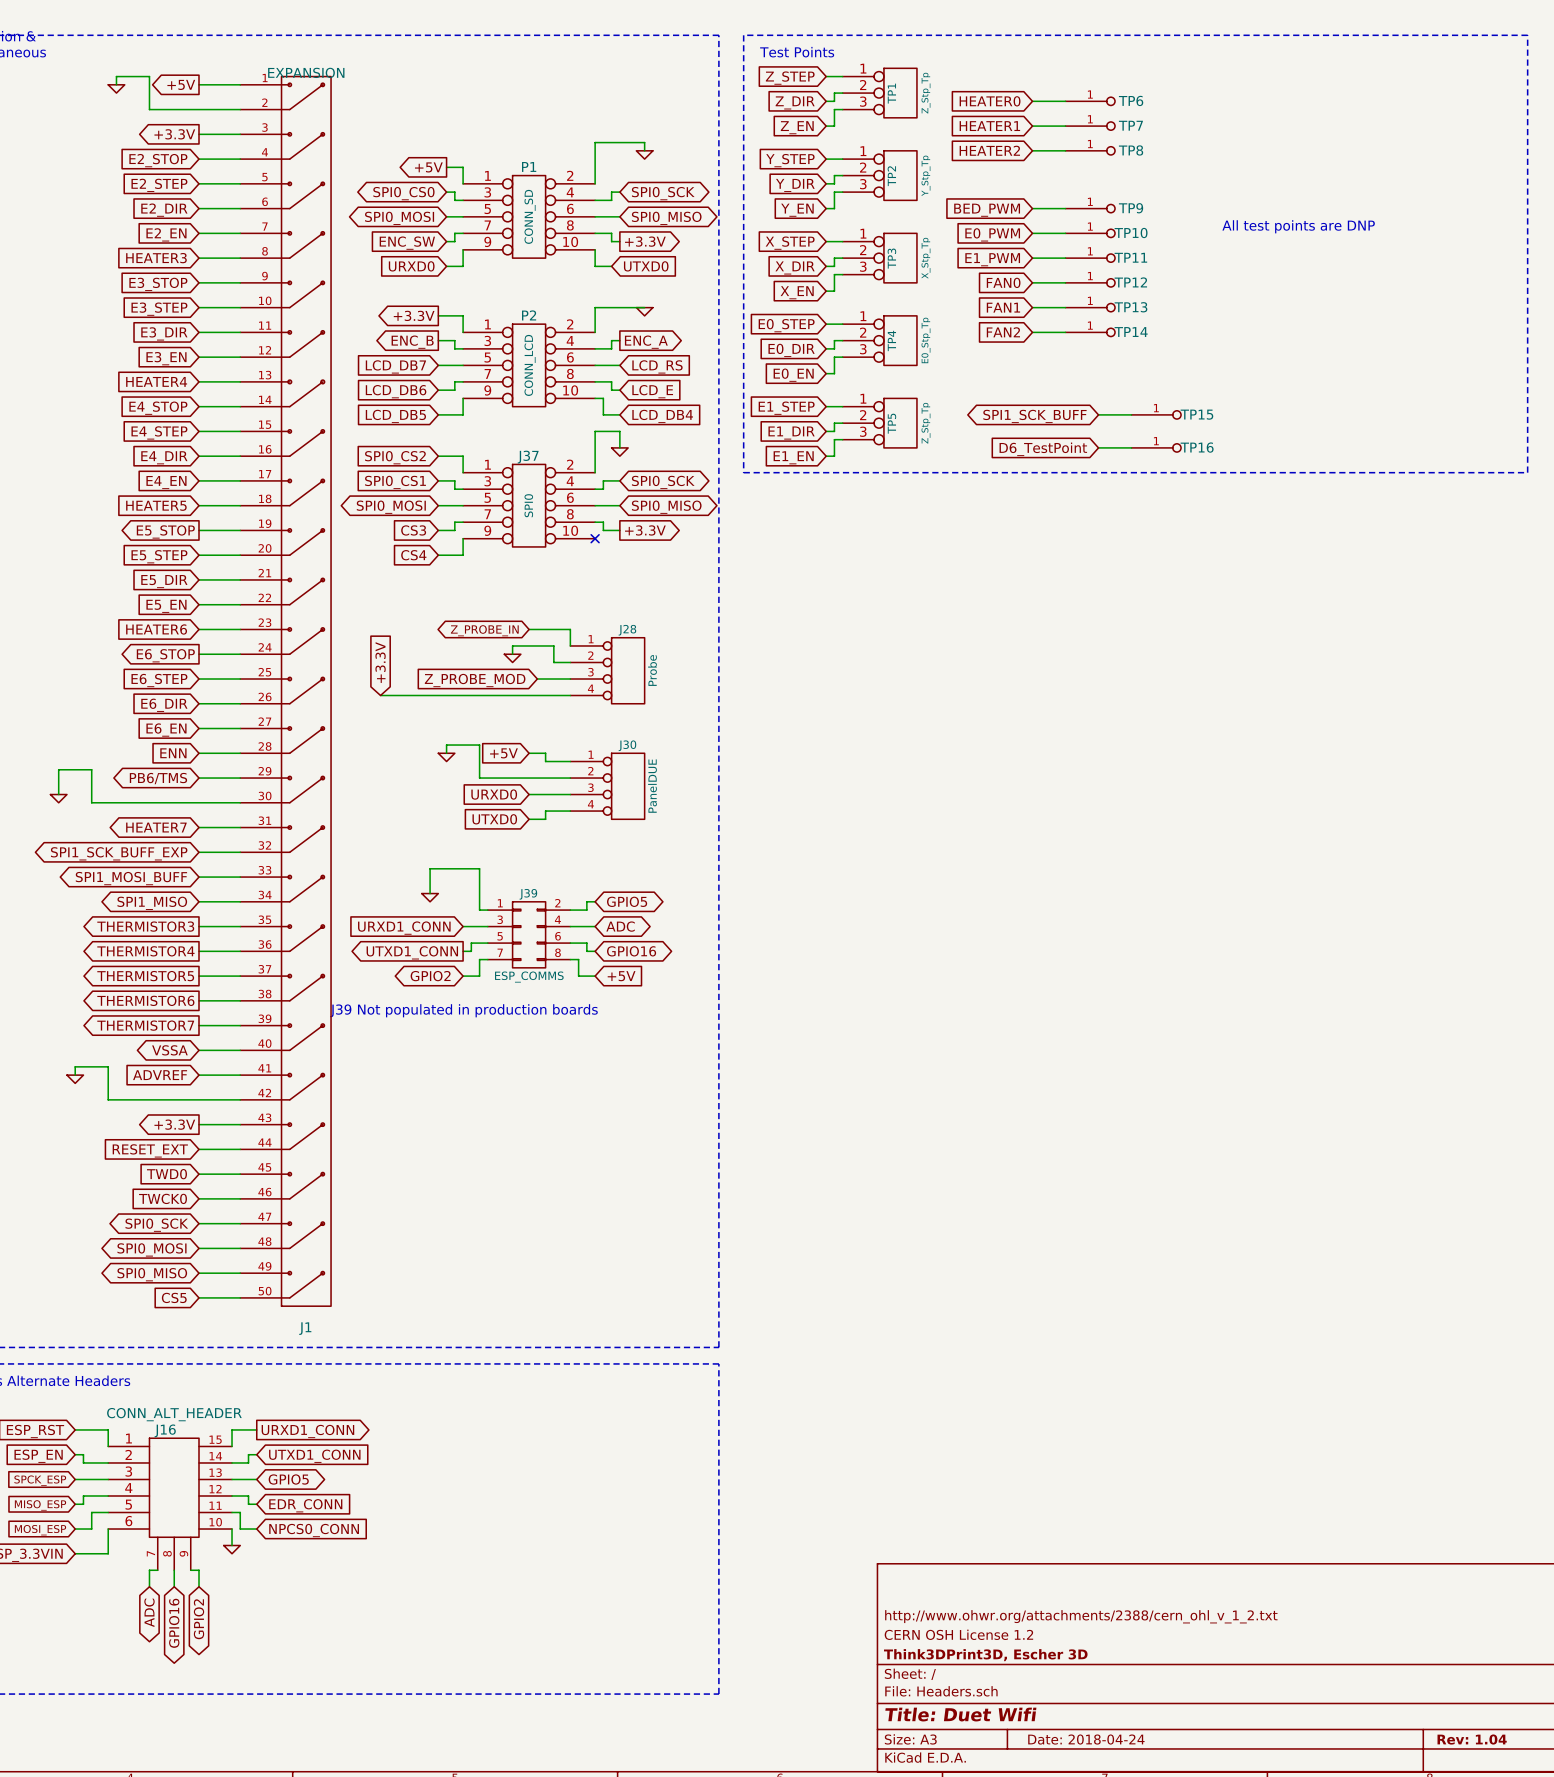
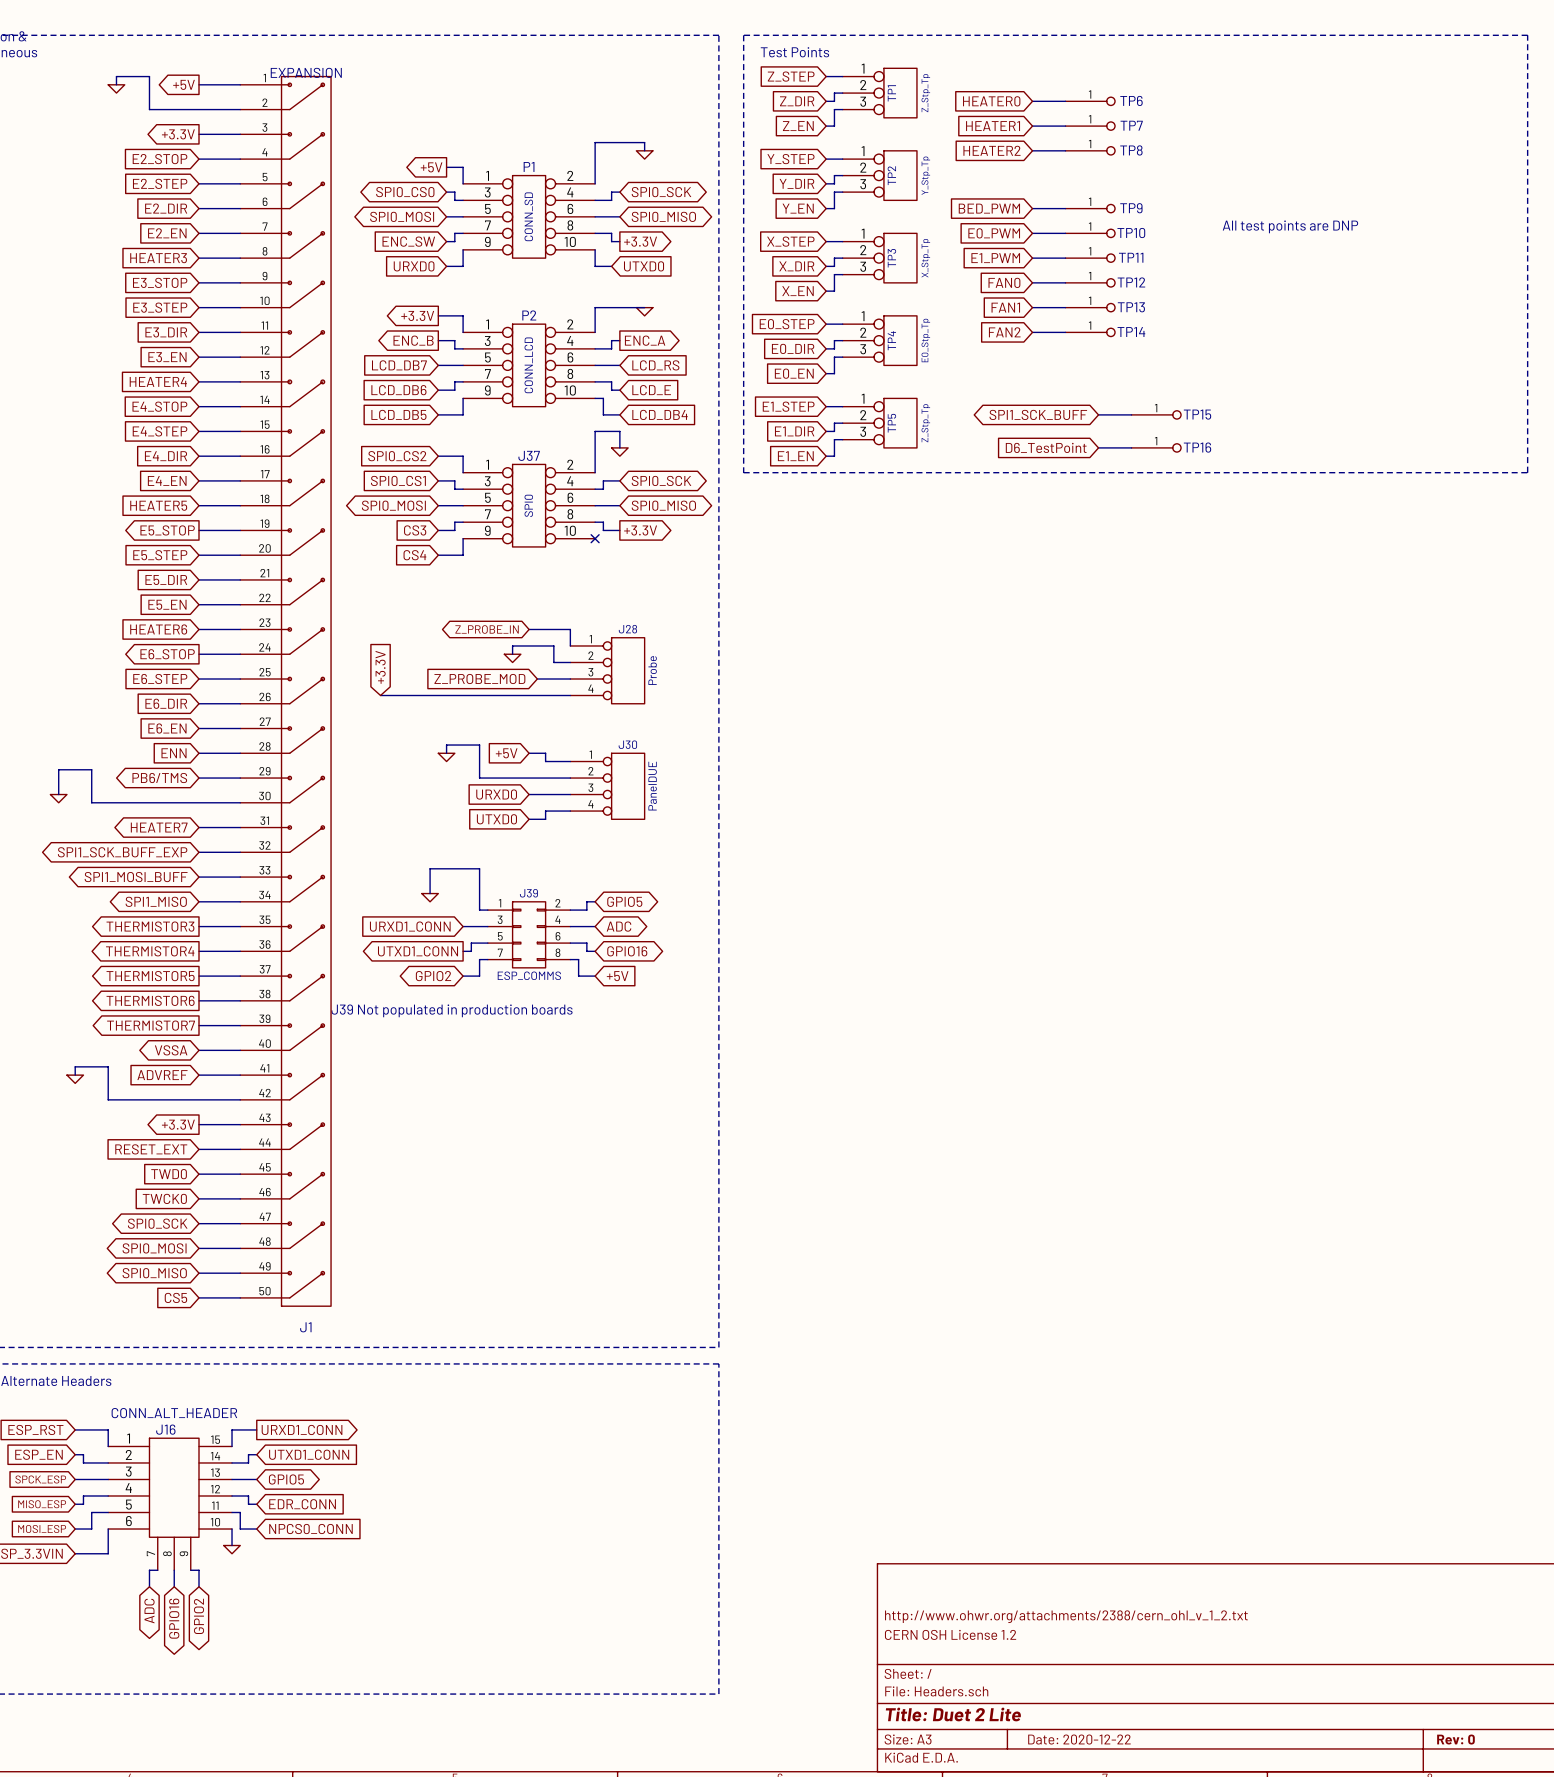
title block: Think3DPrint3D, Escher 3D (985, 1655) -> none
title block: Title: Duet Wifi (960, 1714) -> Title: Duet 2 Lite (953, 1714)
title block: Date: 2018-04-24 (1086, 1739) -> Date: 2020-12-22 (1079, 1739)
title block: Rev: 1.04 (1472, 1739) -> Rev: 0 (1455, 1739)

